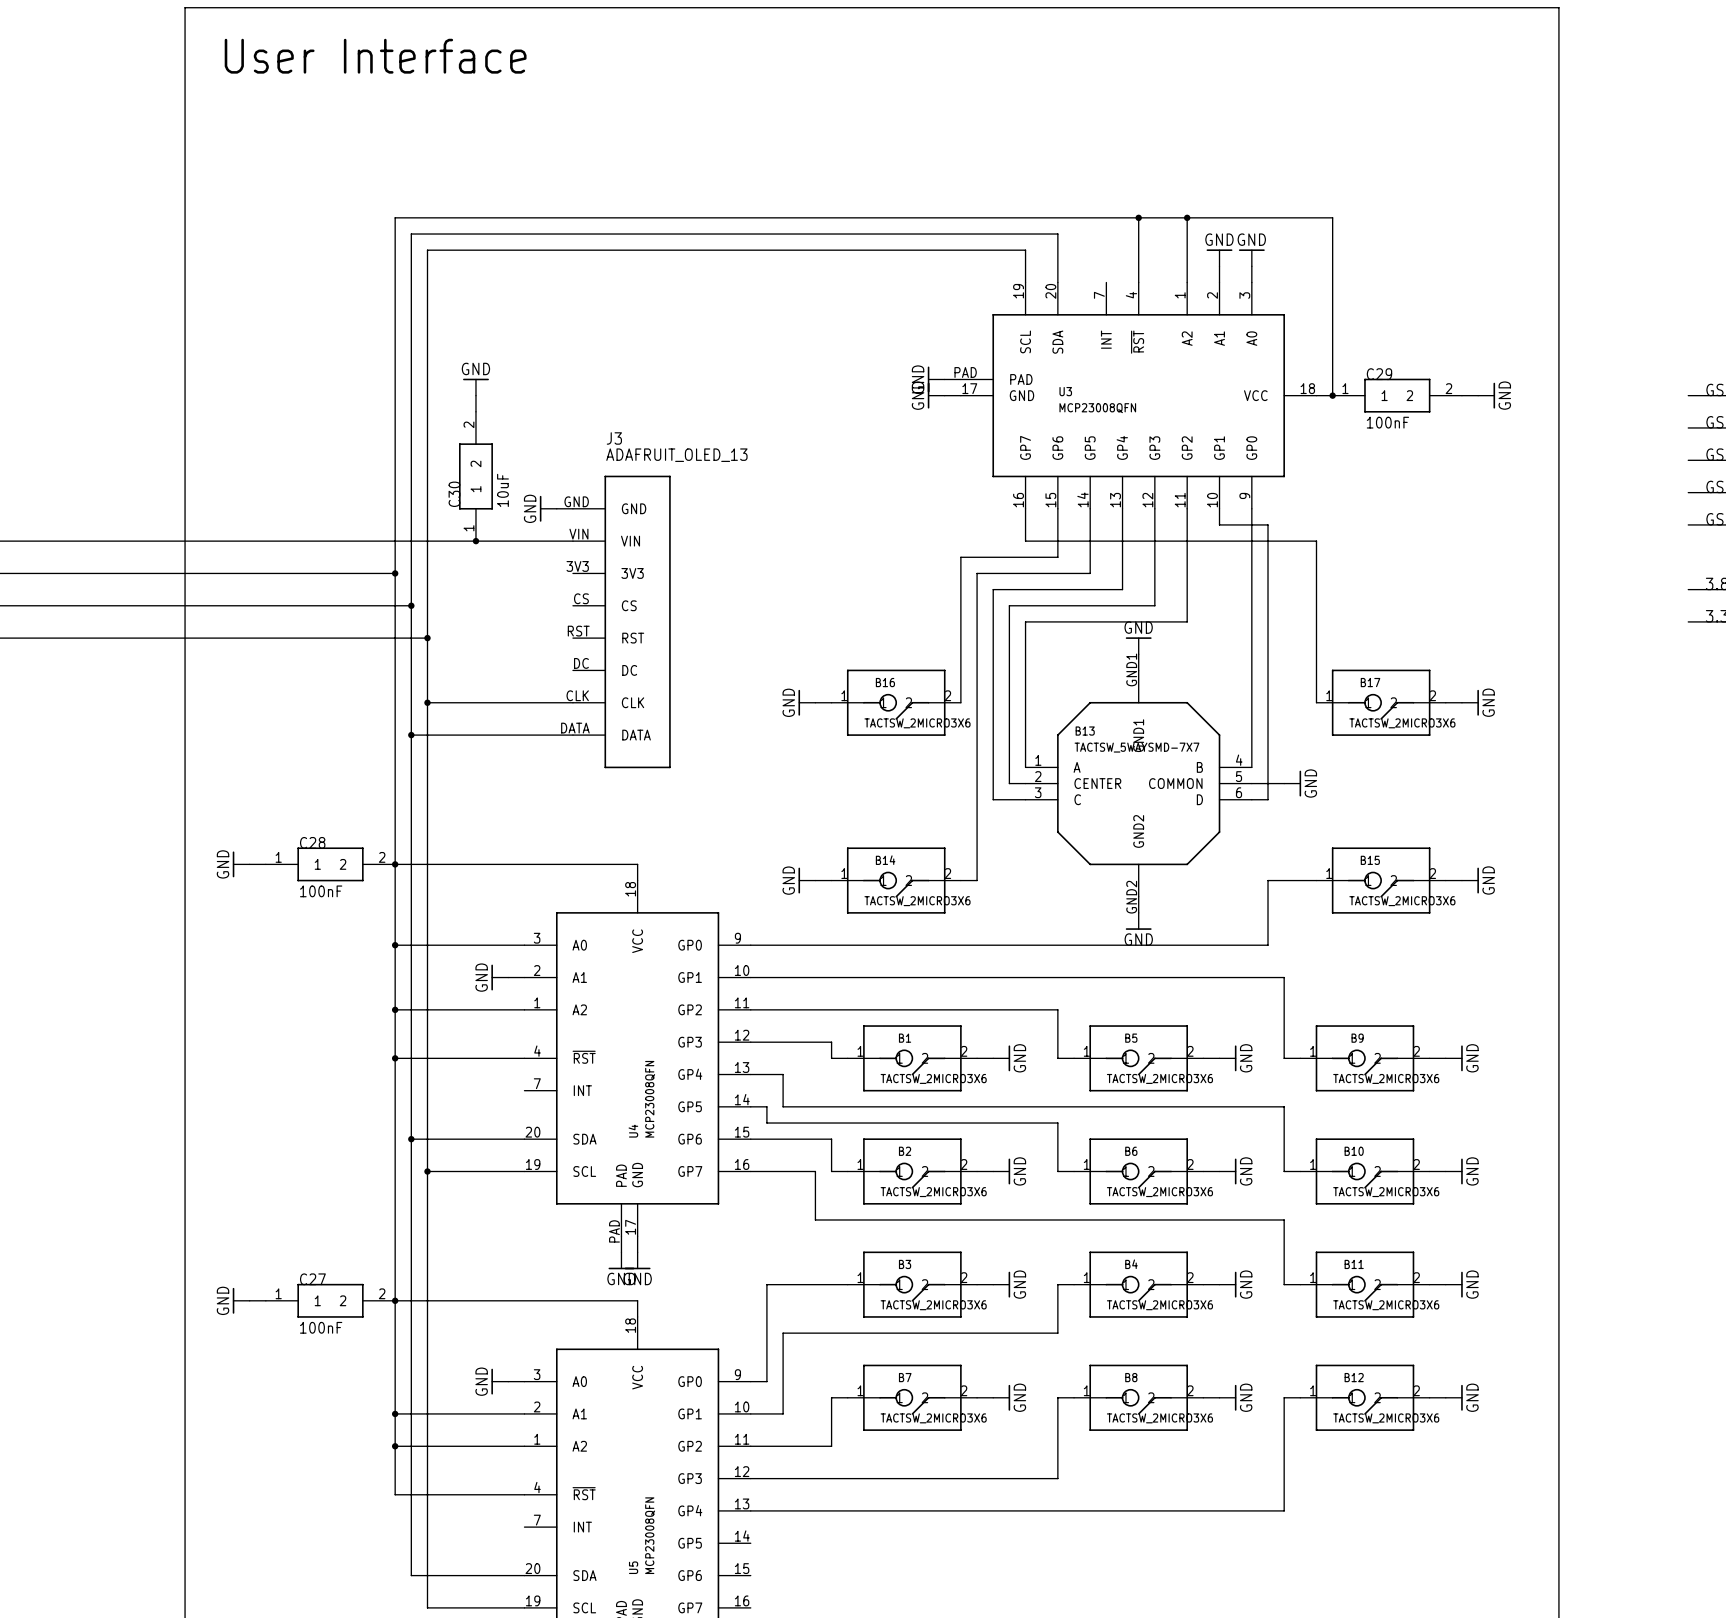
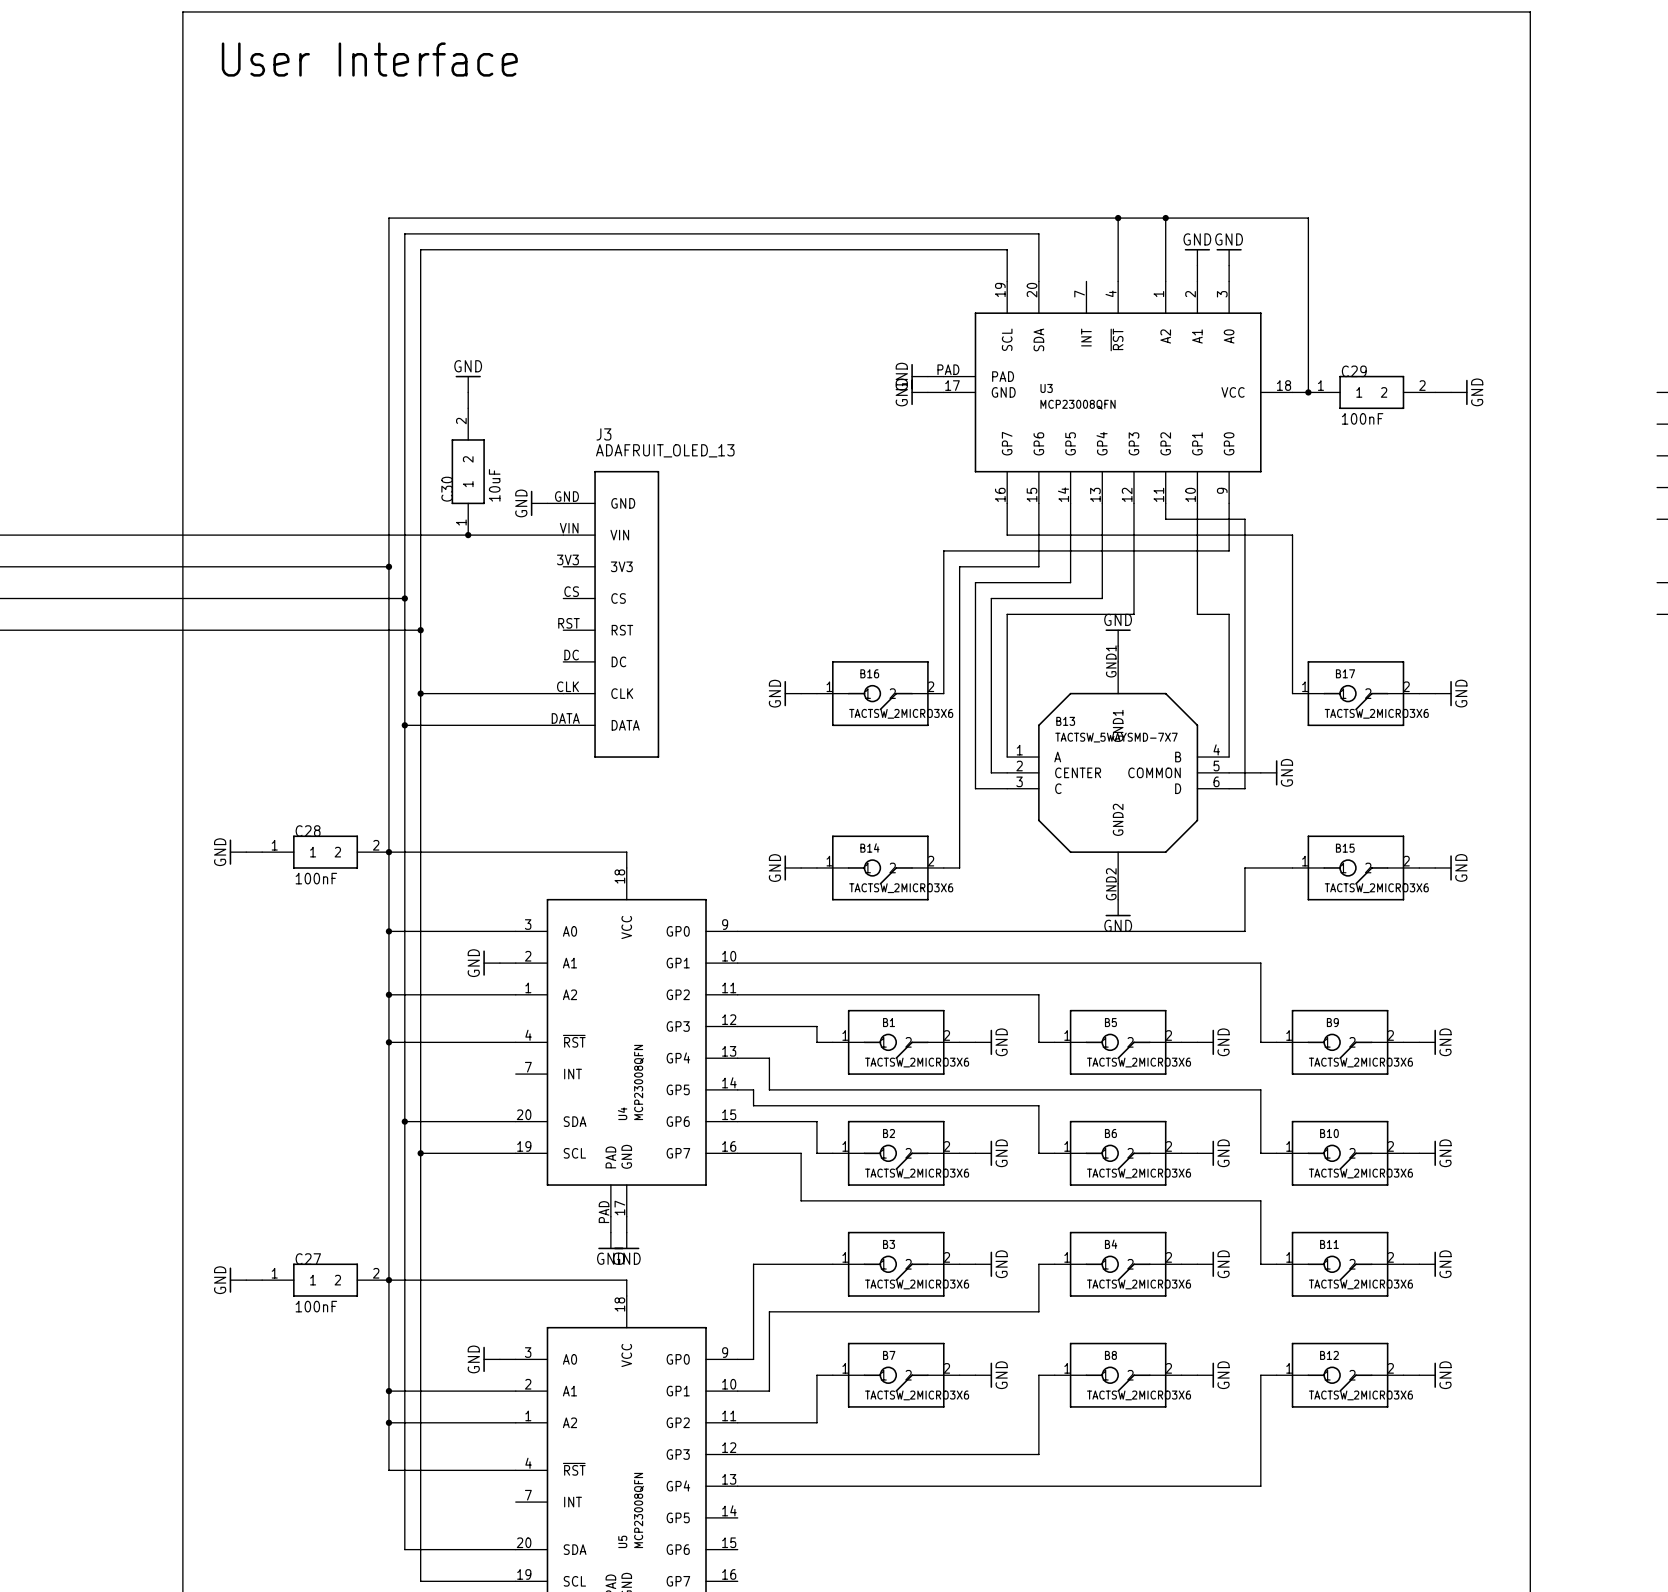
wire: (1187, 524) (1187, 621) (1154, 621) -> none
wire: (1251, 557) (1251, 621) -> (1165, 519) (1197, 519) (1197, 614) (1229, 614)
wire: none -> (1229, 550) (1038, 550) (1038, 566)
wire: (1057, 573) (1090, 573) -> (1070, 582) (1070, 566)
wire: (1090, 589) (1122, 589) -> (1102, 598) (1102, 582)
wire: (1122, 605) (1154, 605) -> (1134, 614) (1134, 598)

